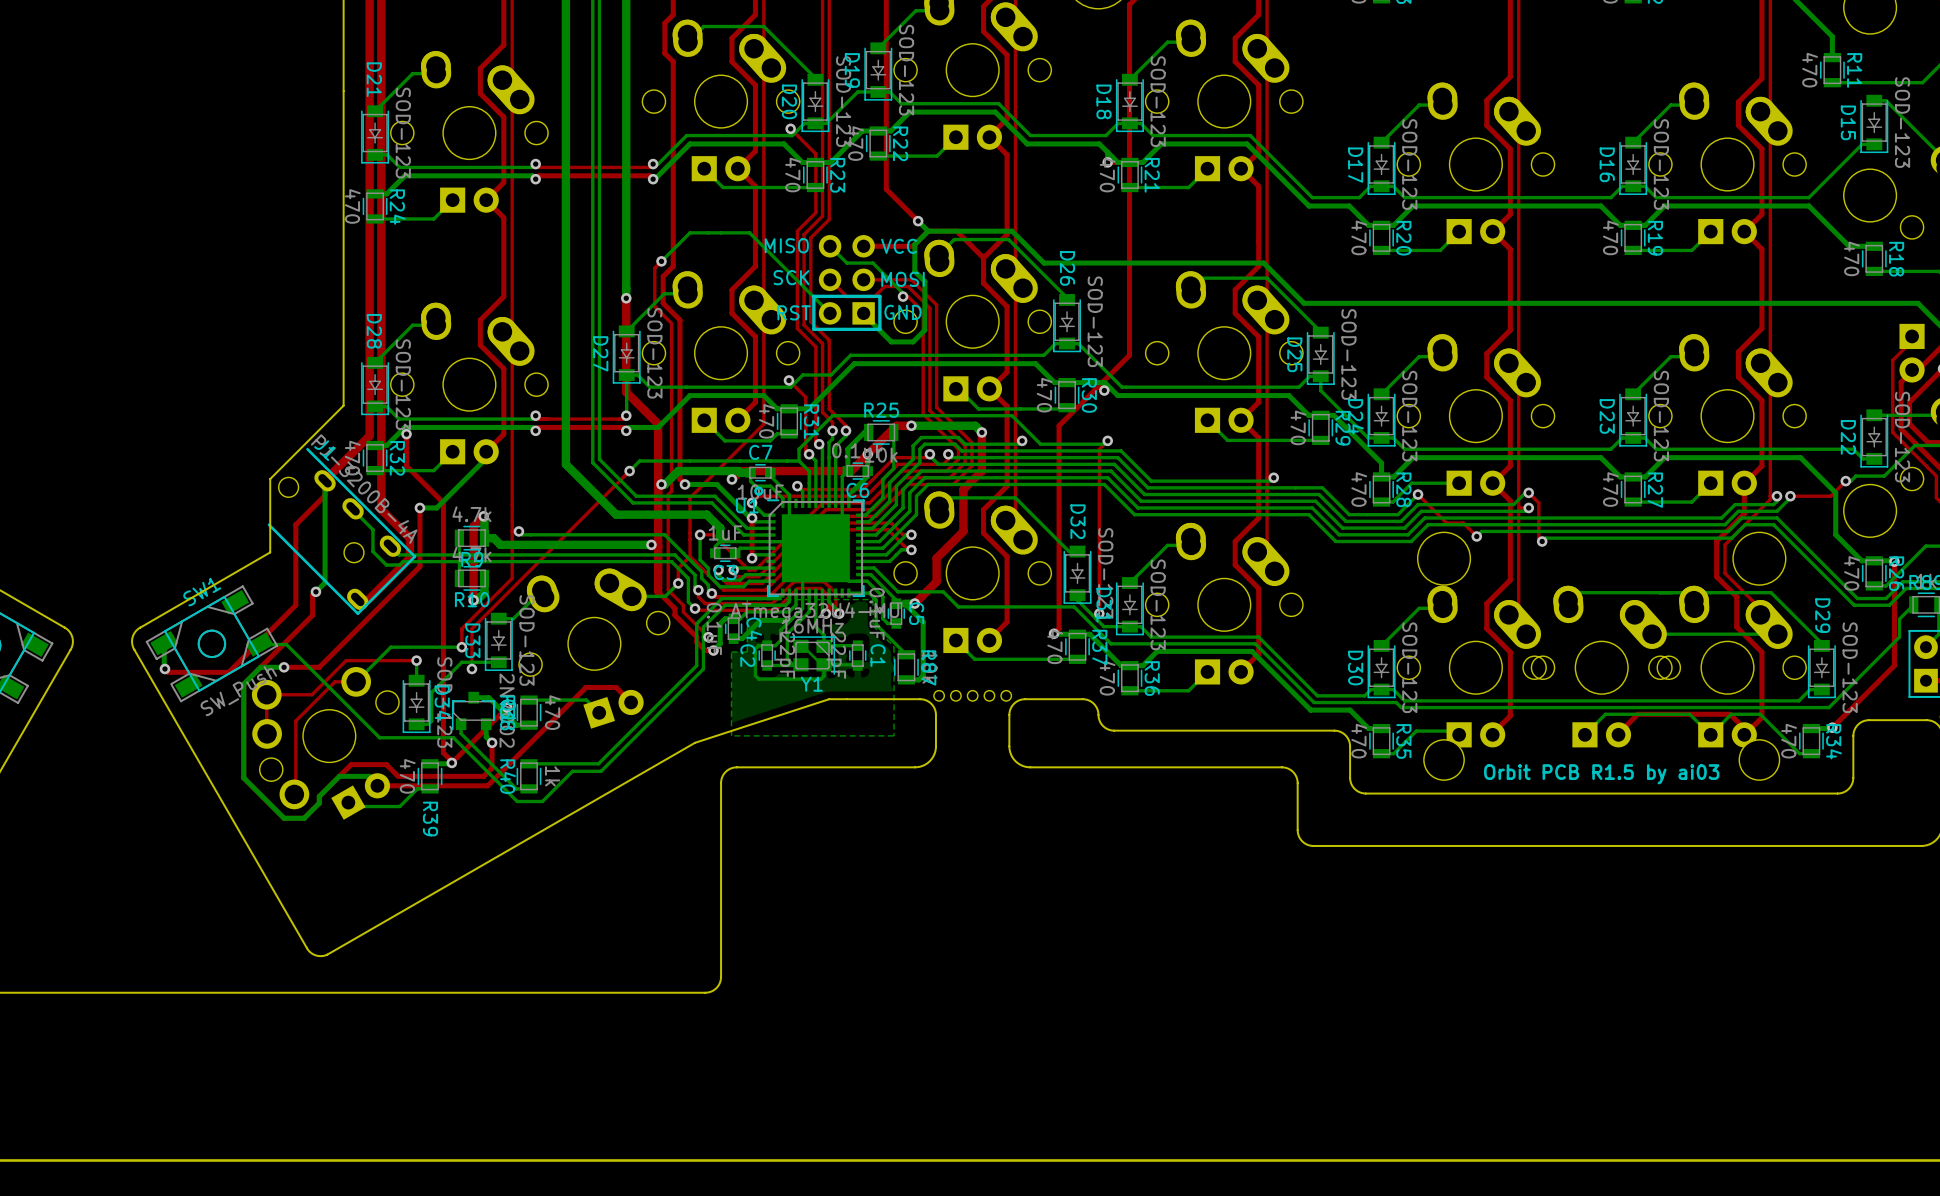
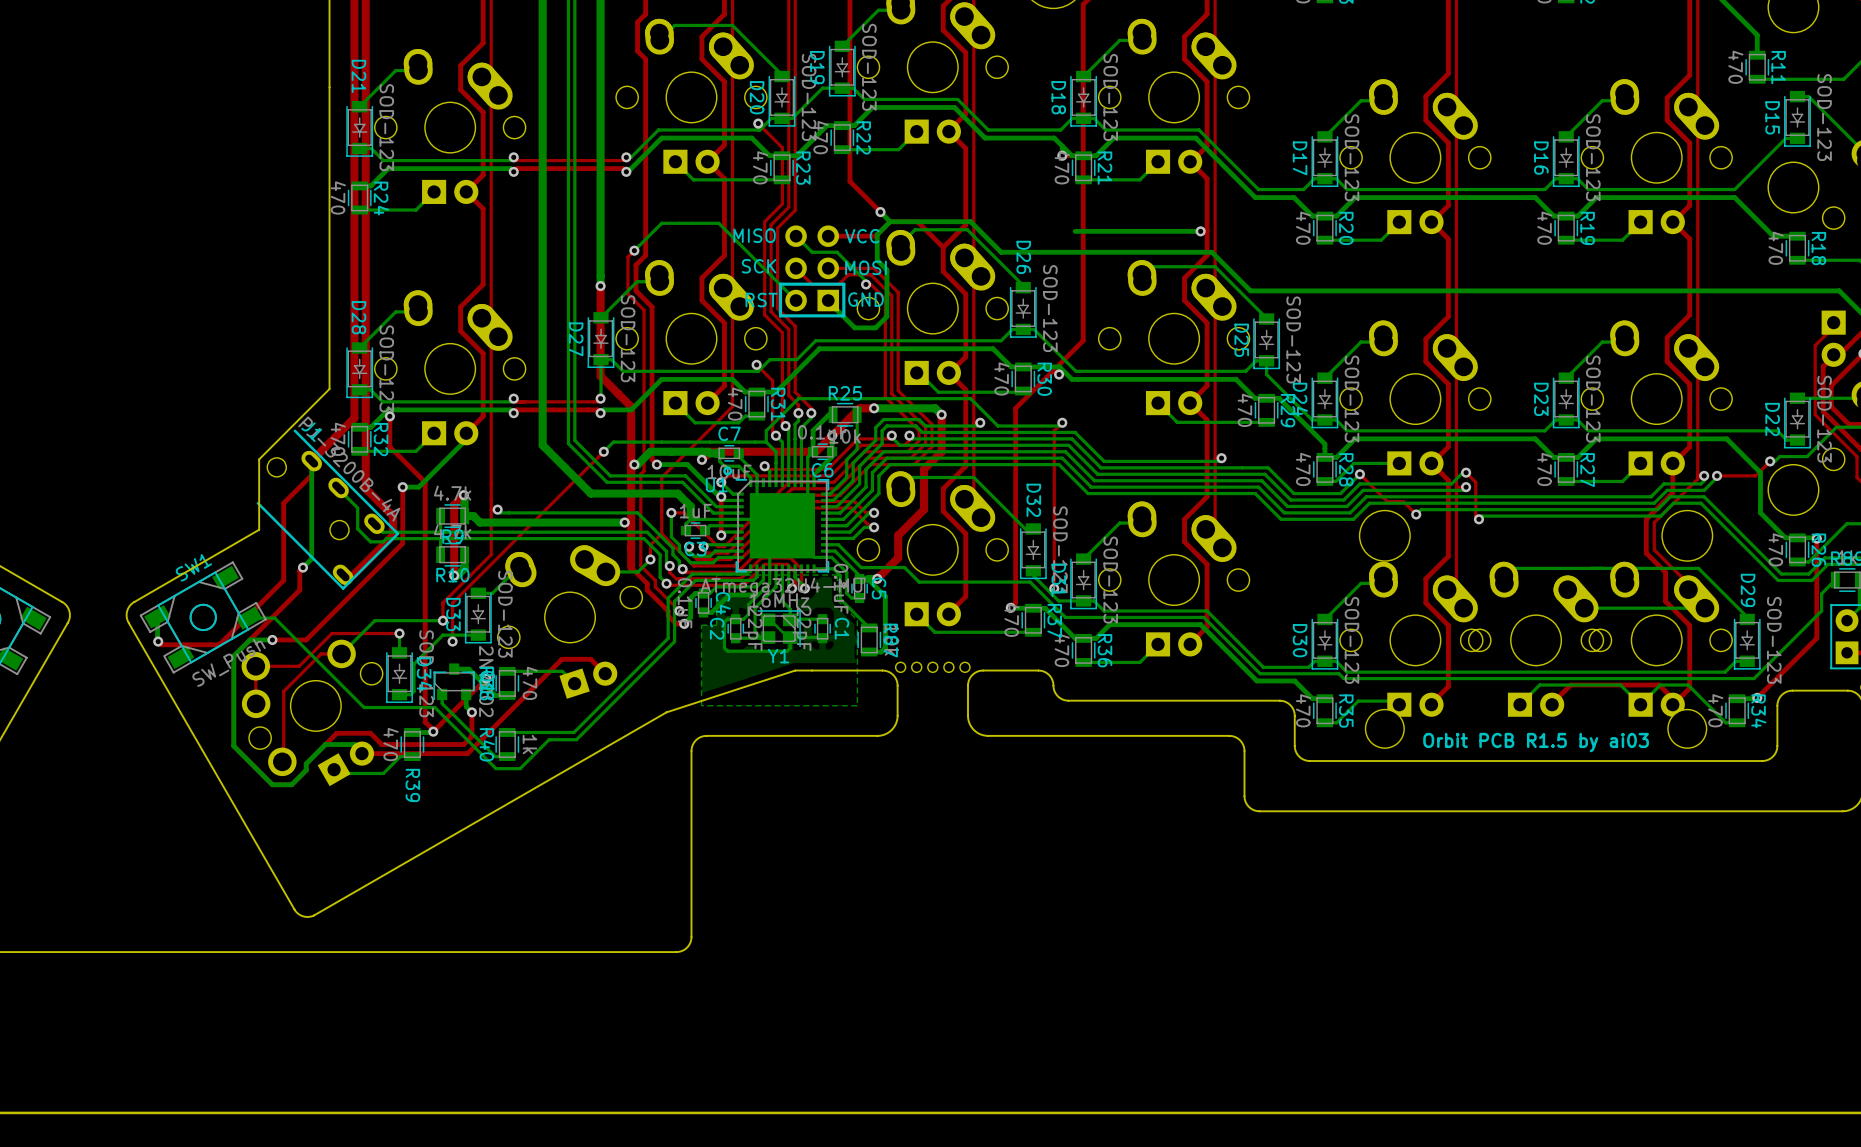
bottom track: none -> (1200, 231) (1075, 231)
via: none -> (1200, 231)

